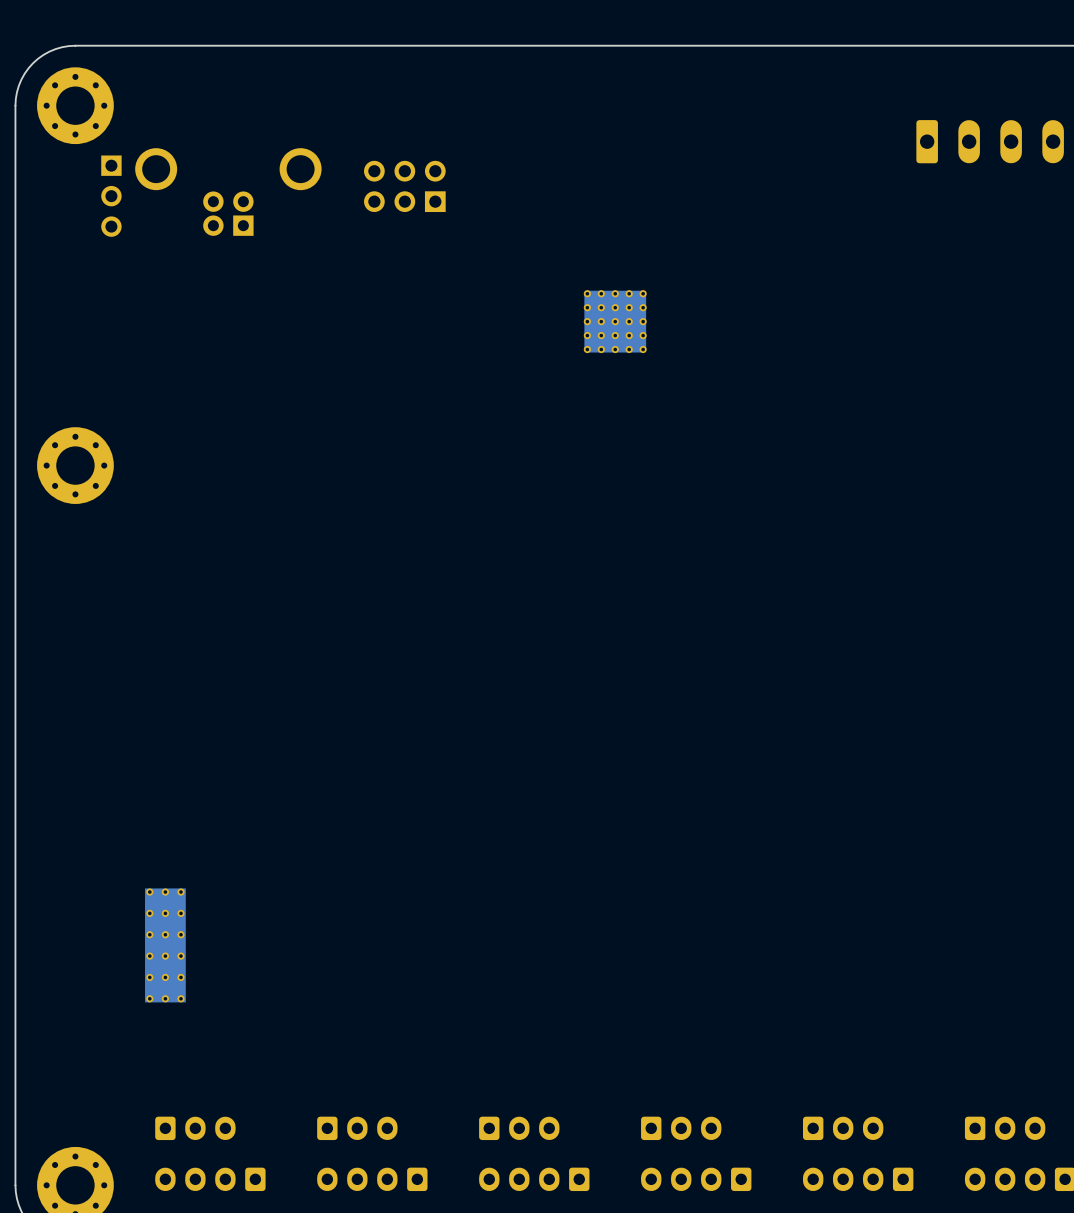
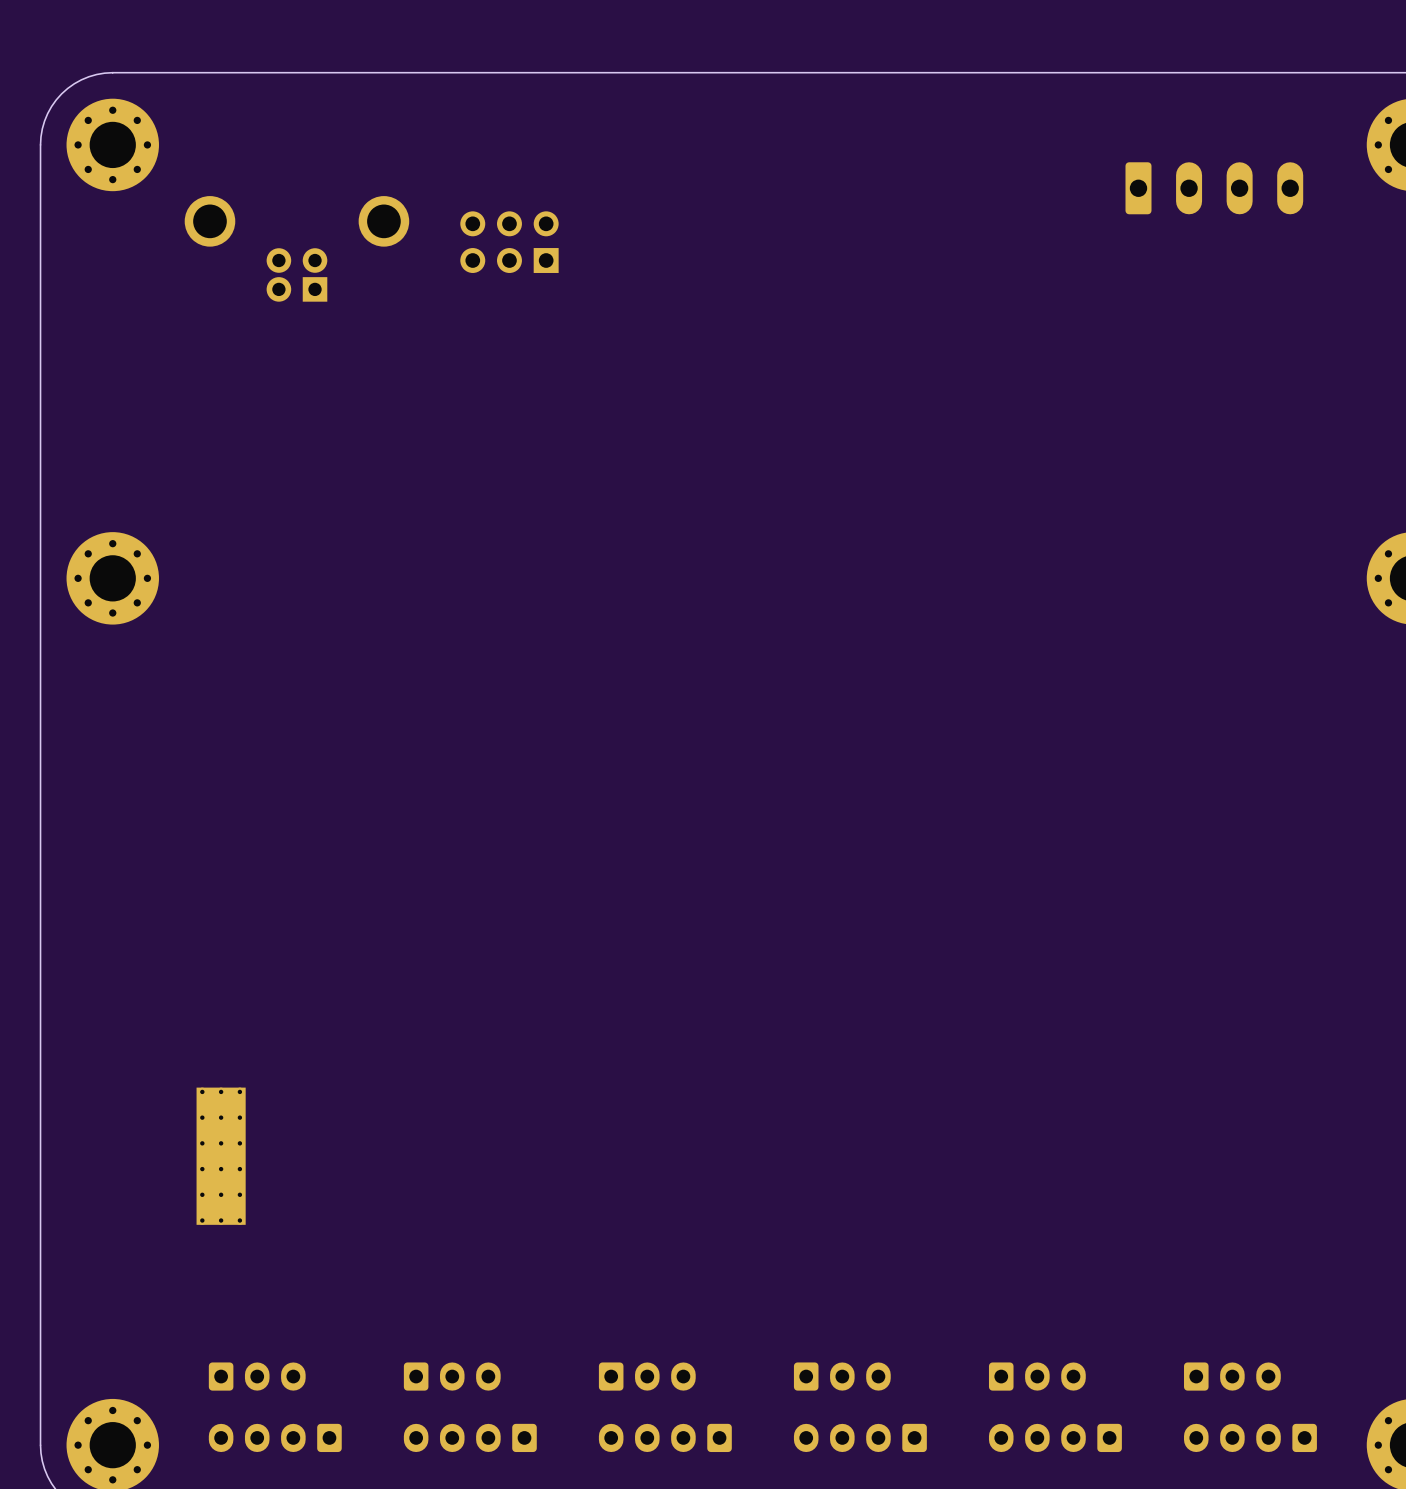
part: (111, 196) -> none
part: (615, 321) -> none

